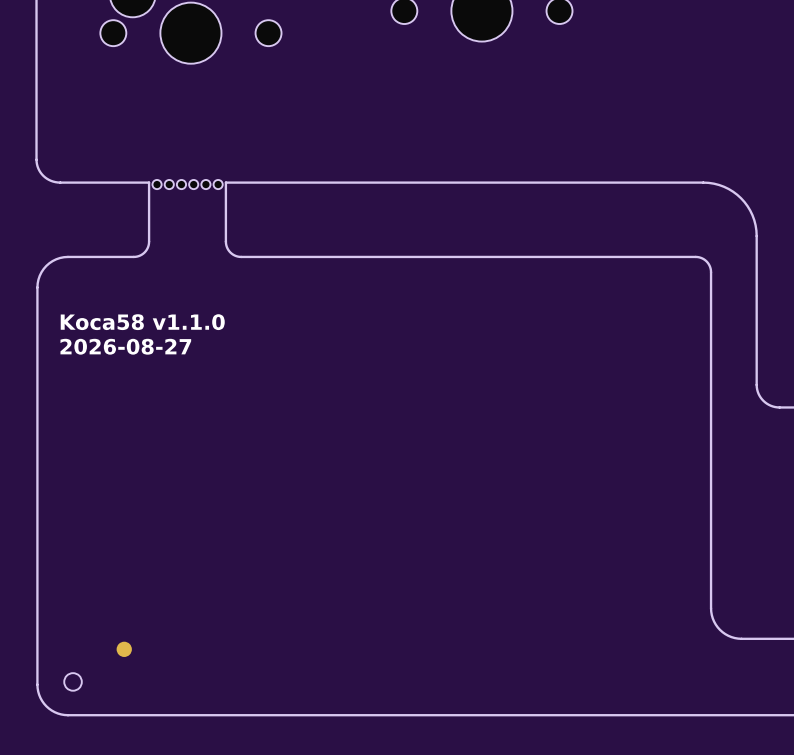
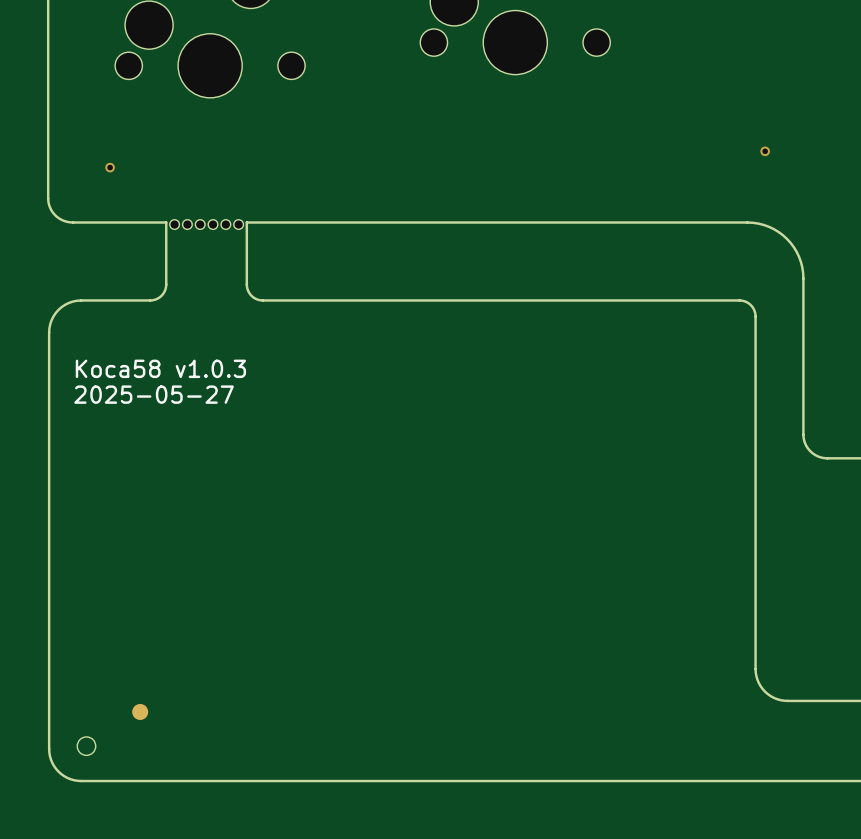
via: none -> (765, 151)
via: none -> (110, 167)
text: Koca58 v1.1.0 (142, 322) -> Koca58 v1.0.3 (160, 368)
text: 2026-08-27 (125, 346) -> 2025-05-27 (154, 394)

